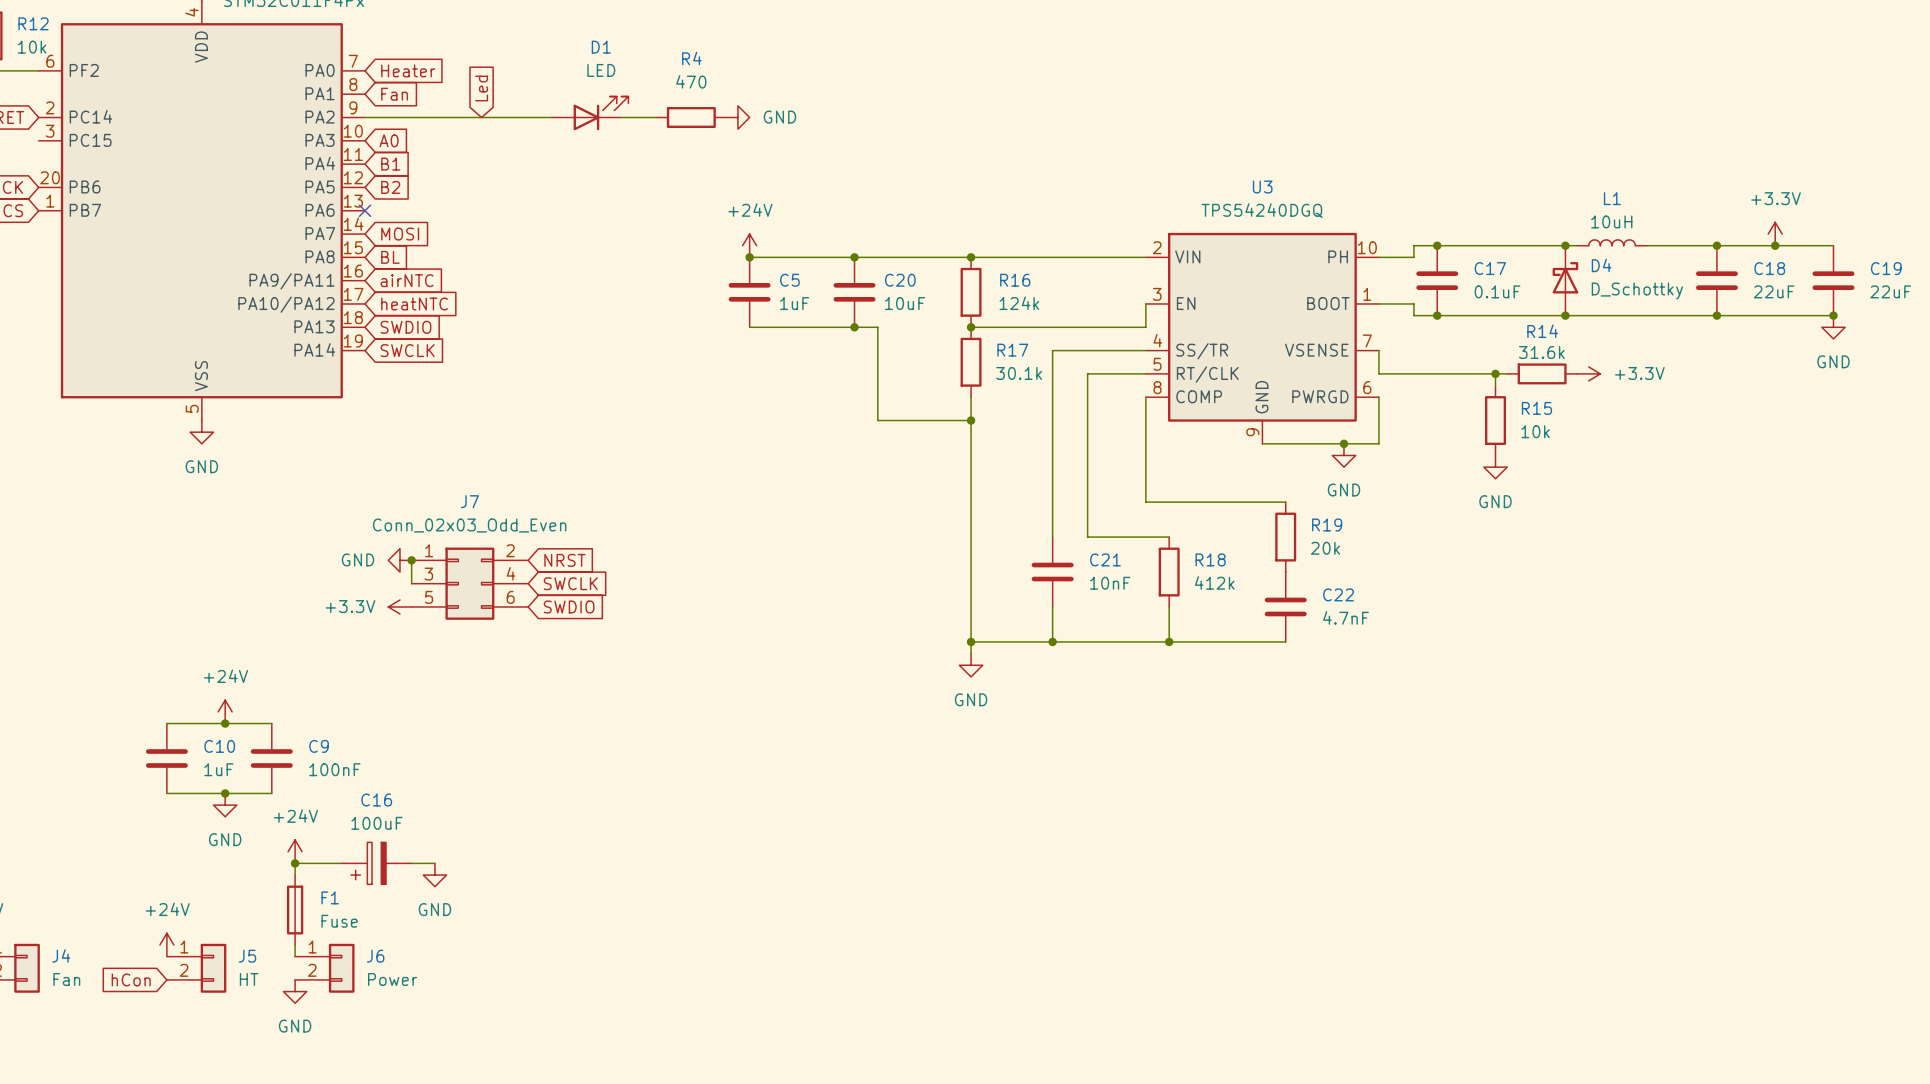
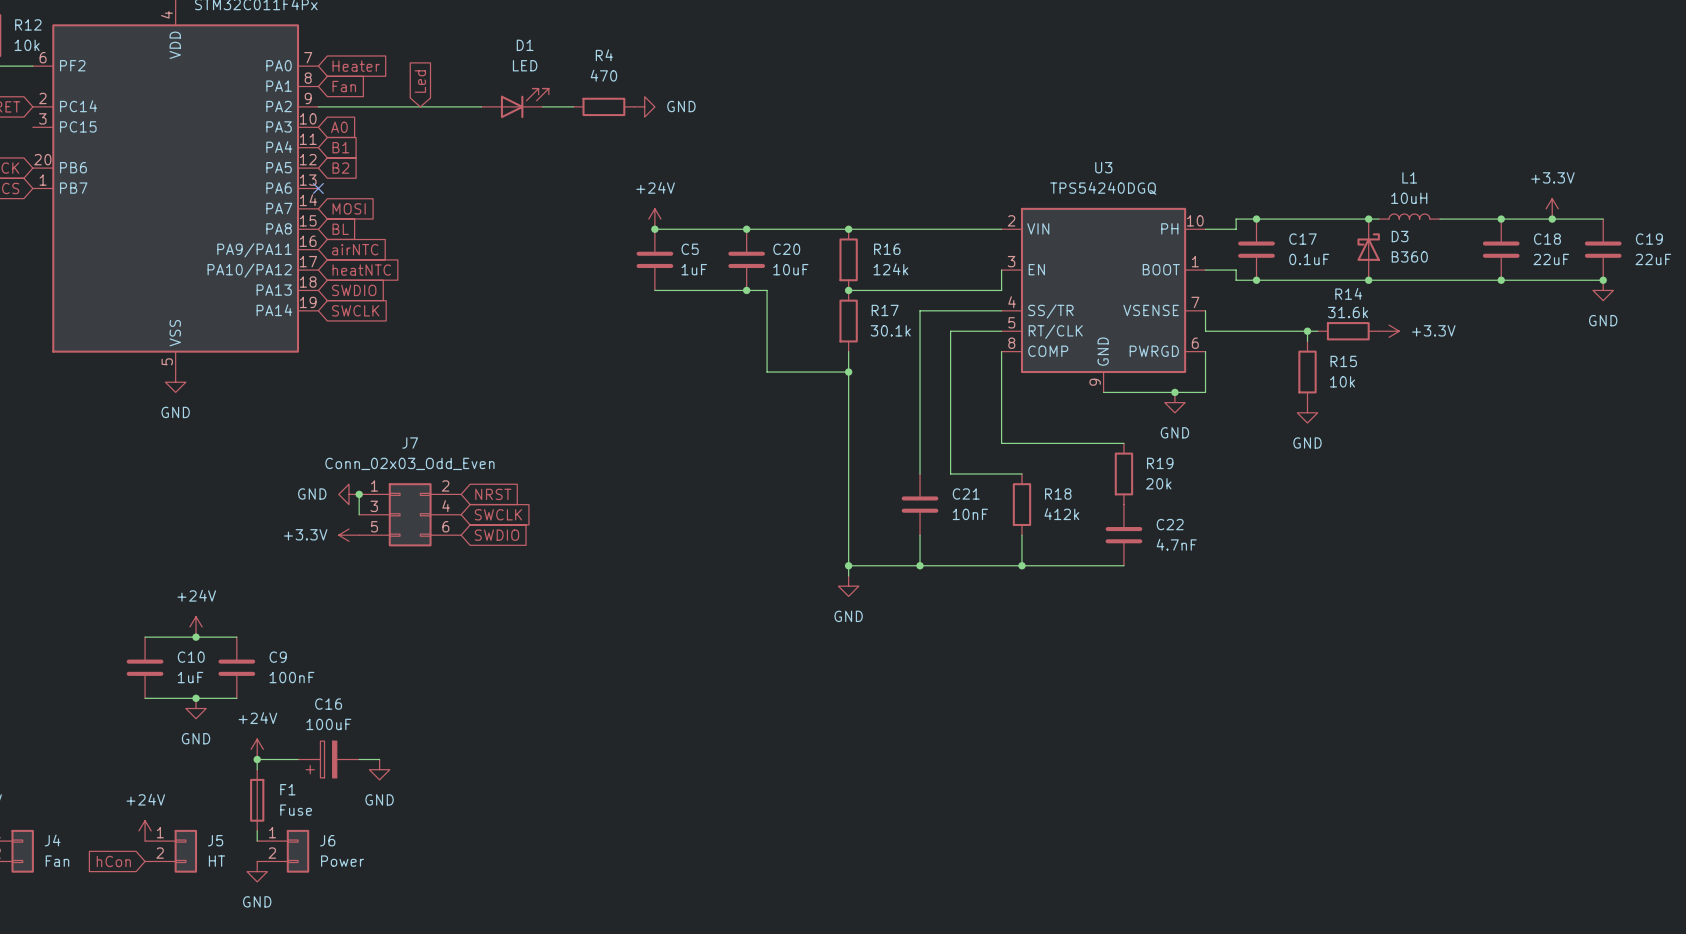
D4 name: D4 (1601, 265) -> D3 (1400, 236)
D4 value: D_Schottky (1637, 290) -> B360 (1409, 256)

